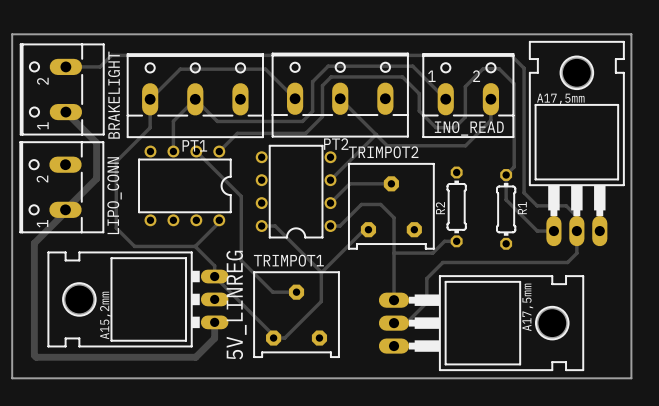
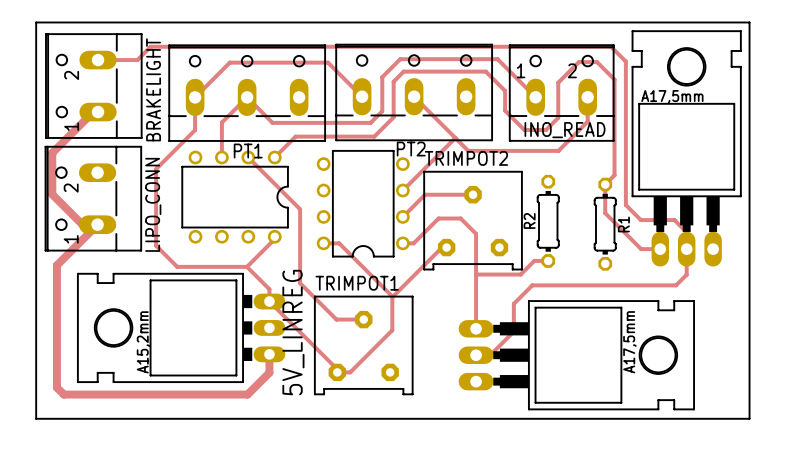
track: (65, 112) (96, 142) (96, 178) (34, 243) (34, 355) -> (98, 112) (93, 112) (52, 153) (52, 194) (82, 224) (97, 224) (56, 265) (56, 387) (61, 392)

